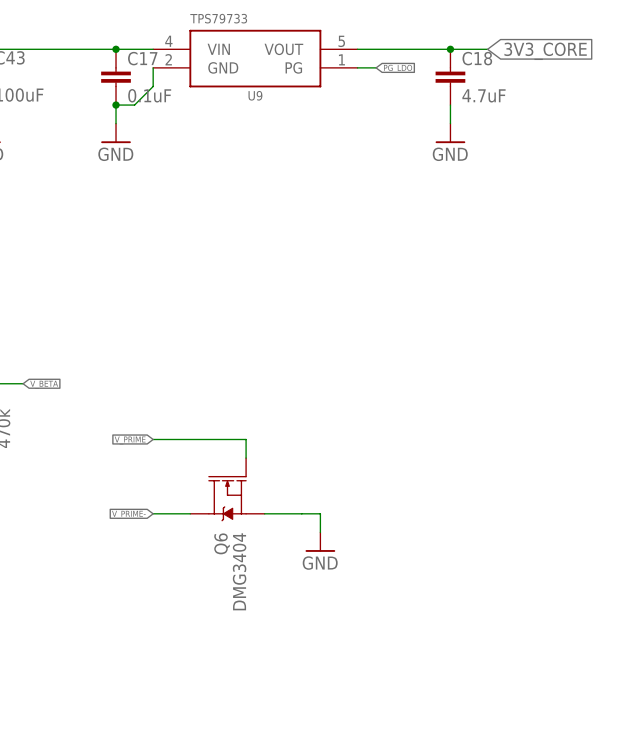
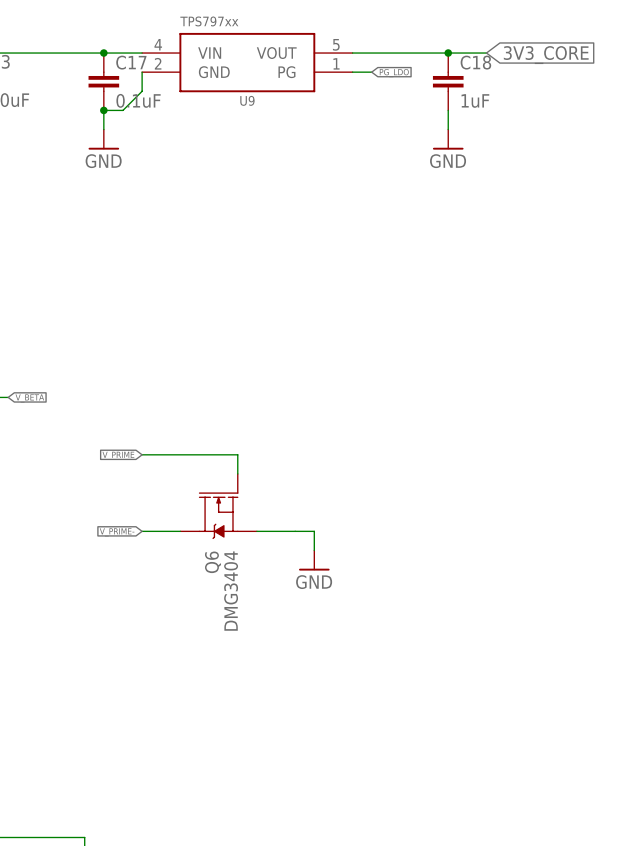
U9 text: none -> TPS797xx (209, 21)
U9 text: TPS79733 (218, 18) -> none
C18 value: 4.7uF (484, 95) -> 1uF (475, 100)

